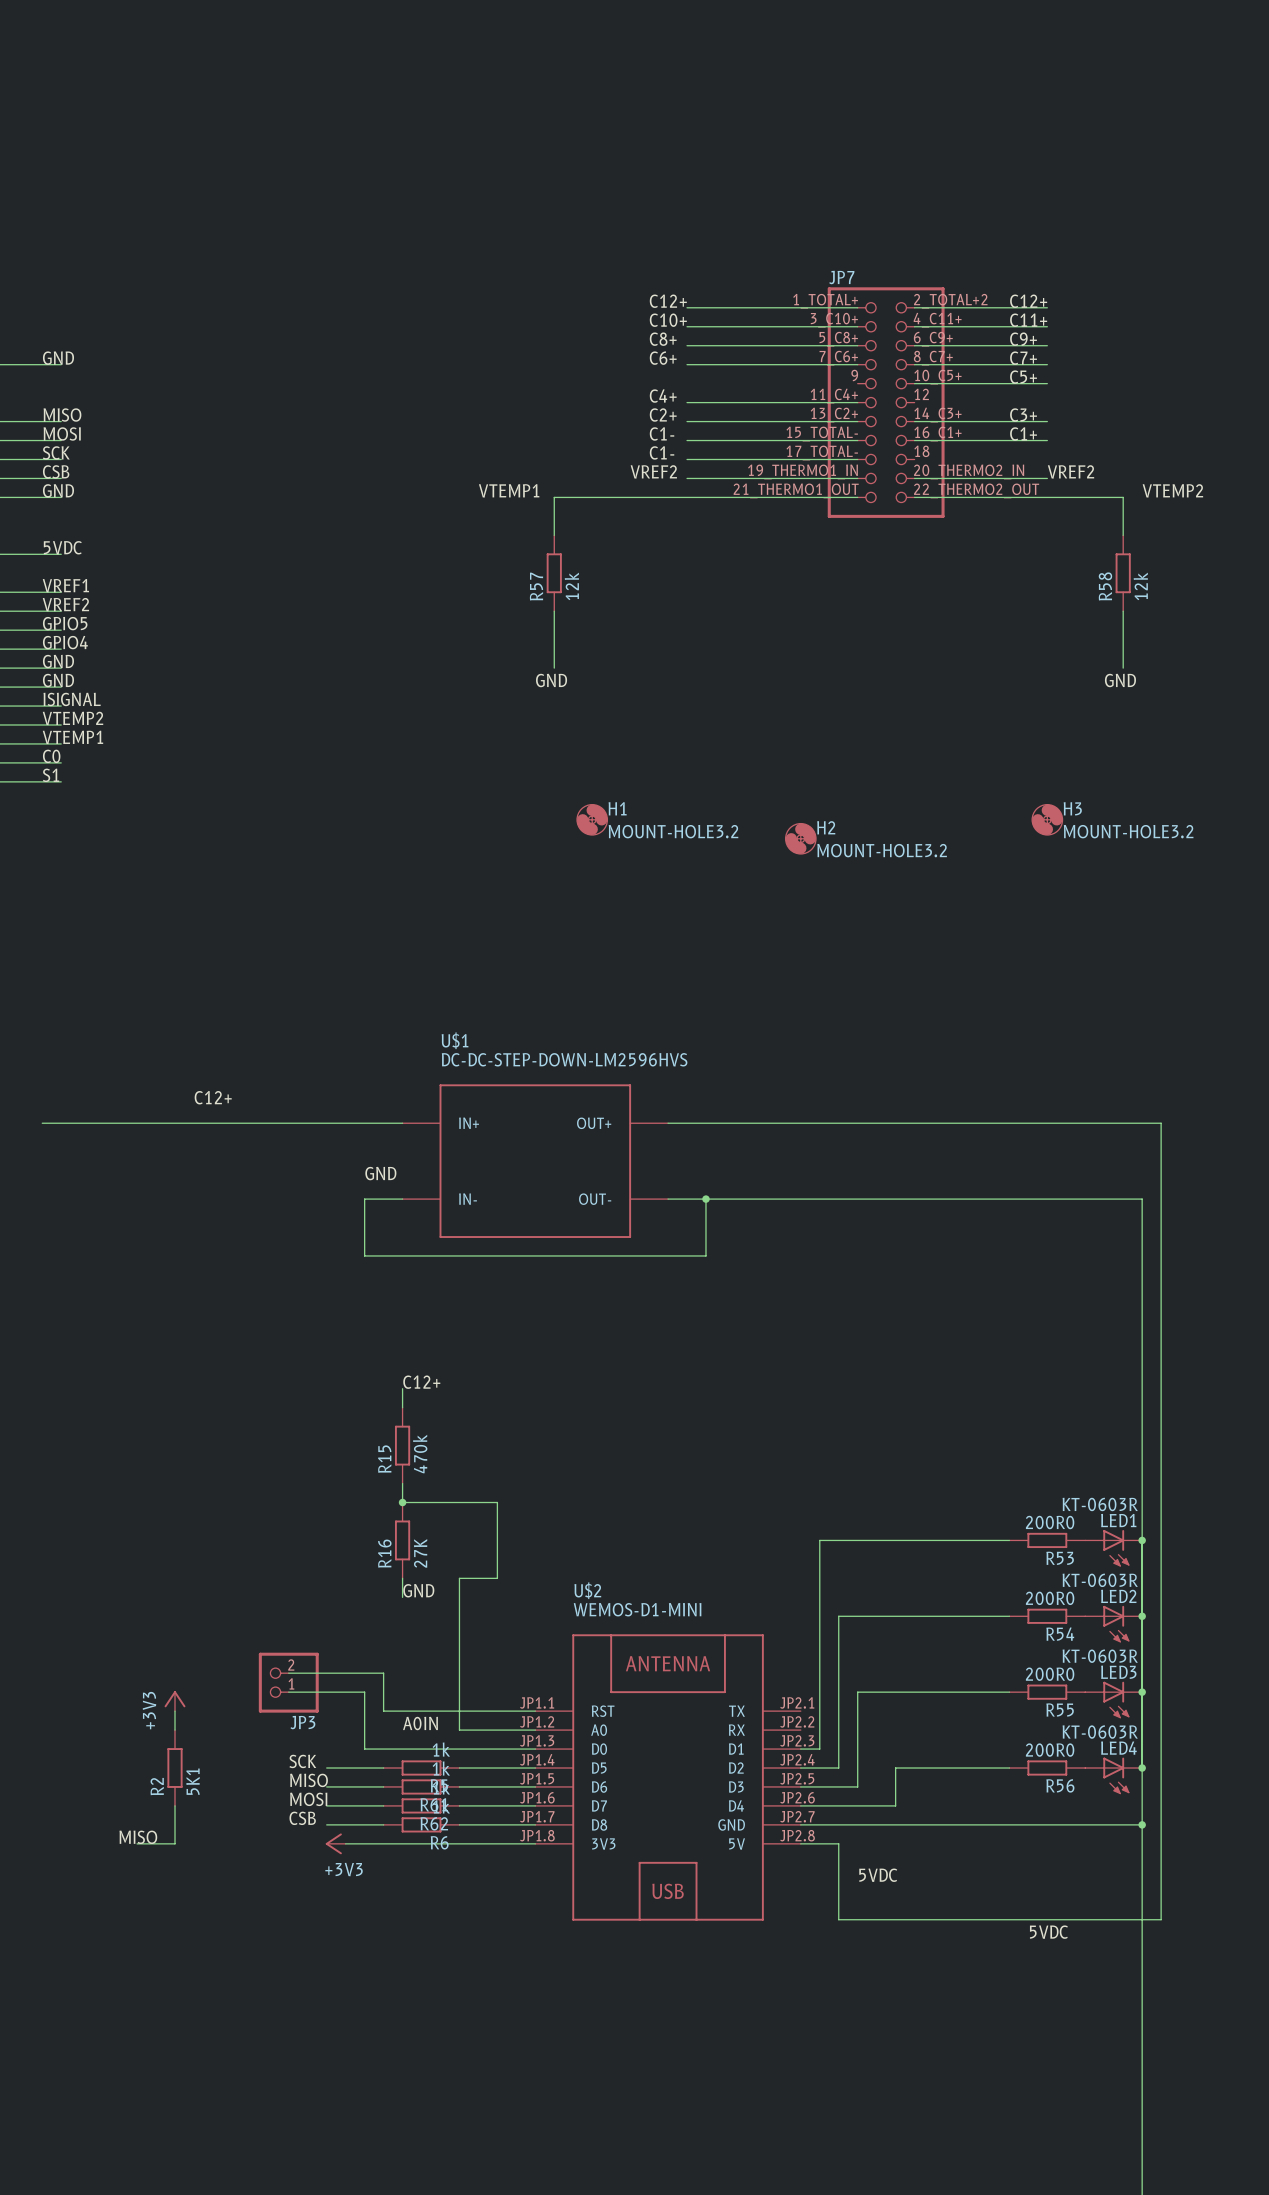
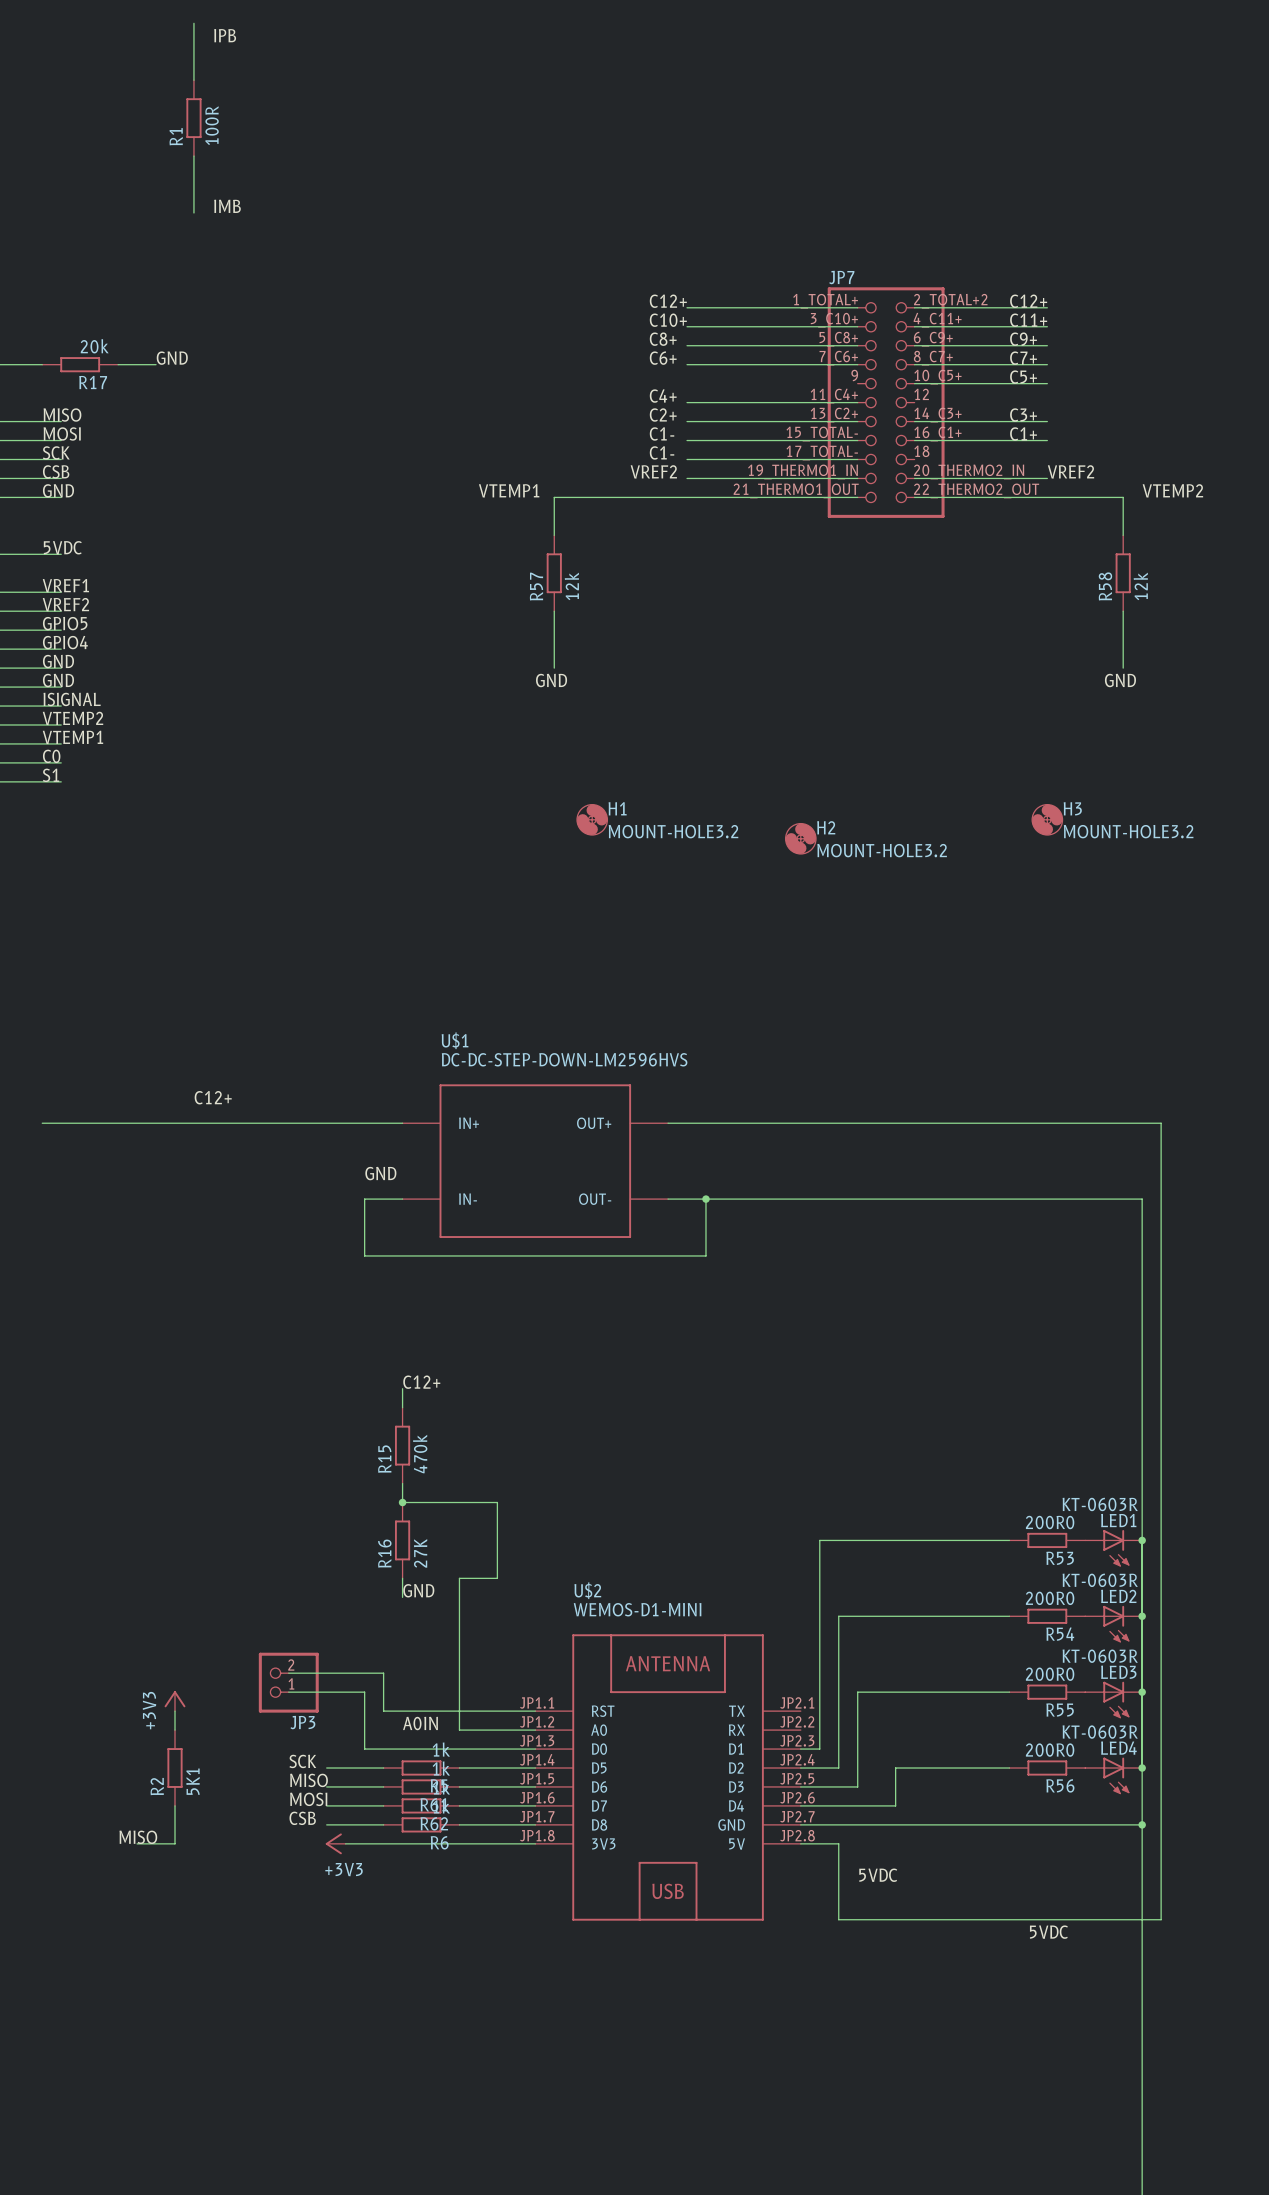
wire: none -> (193, 23) (193, 80)
label: none -> IPB (225, 35)
R1: none -> 100R (193, 118)
wire: none -> (193, 156) (193, 212)
label: none -> IMB (227, 206)
label position: GND (58, 358) -> GND (172, 358)
R17: none -> 20k (80, 364)
wire: none -> (118, 364) (156, 364)

